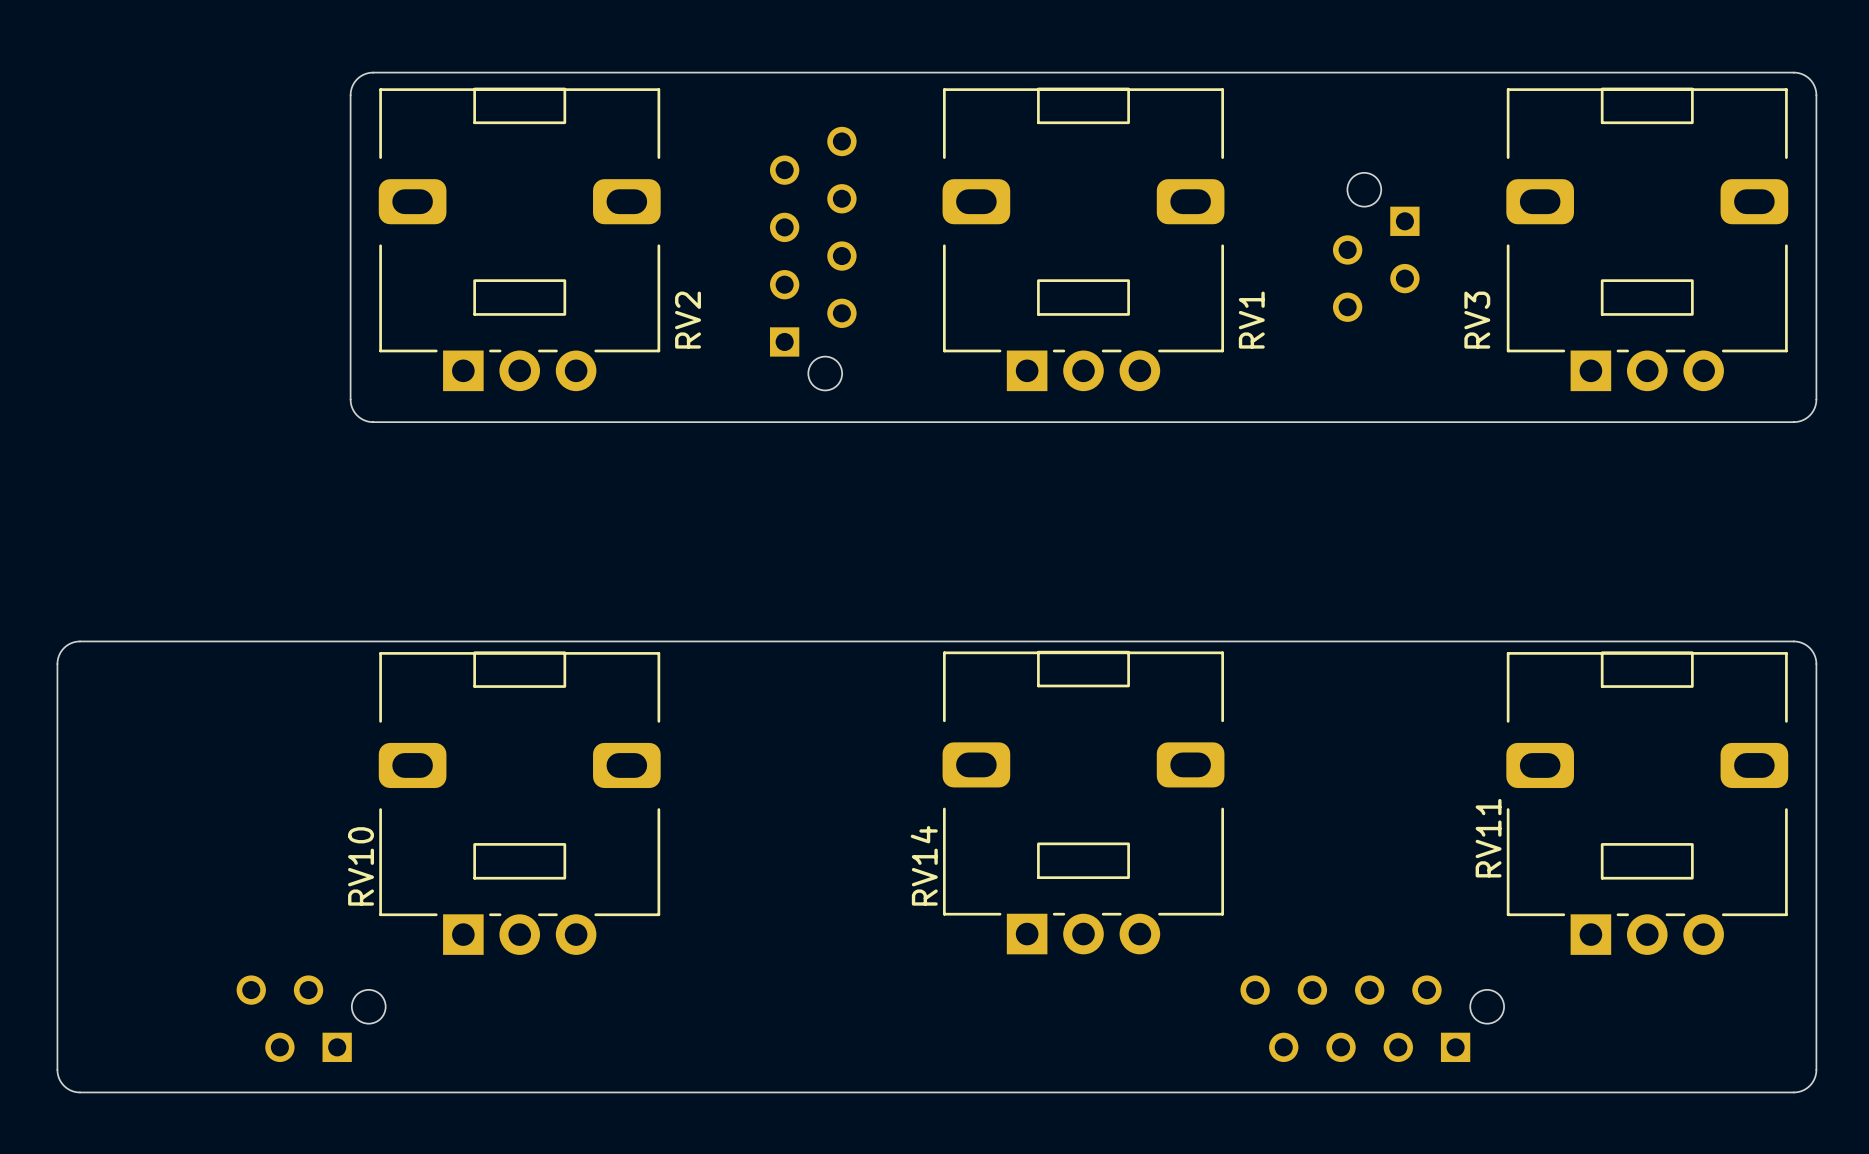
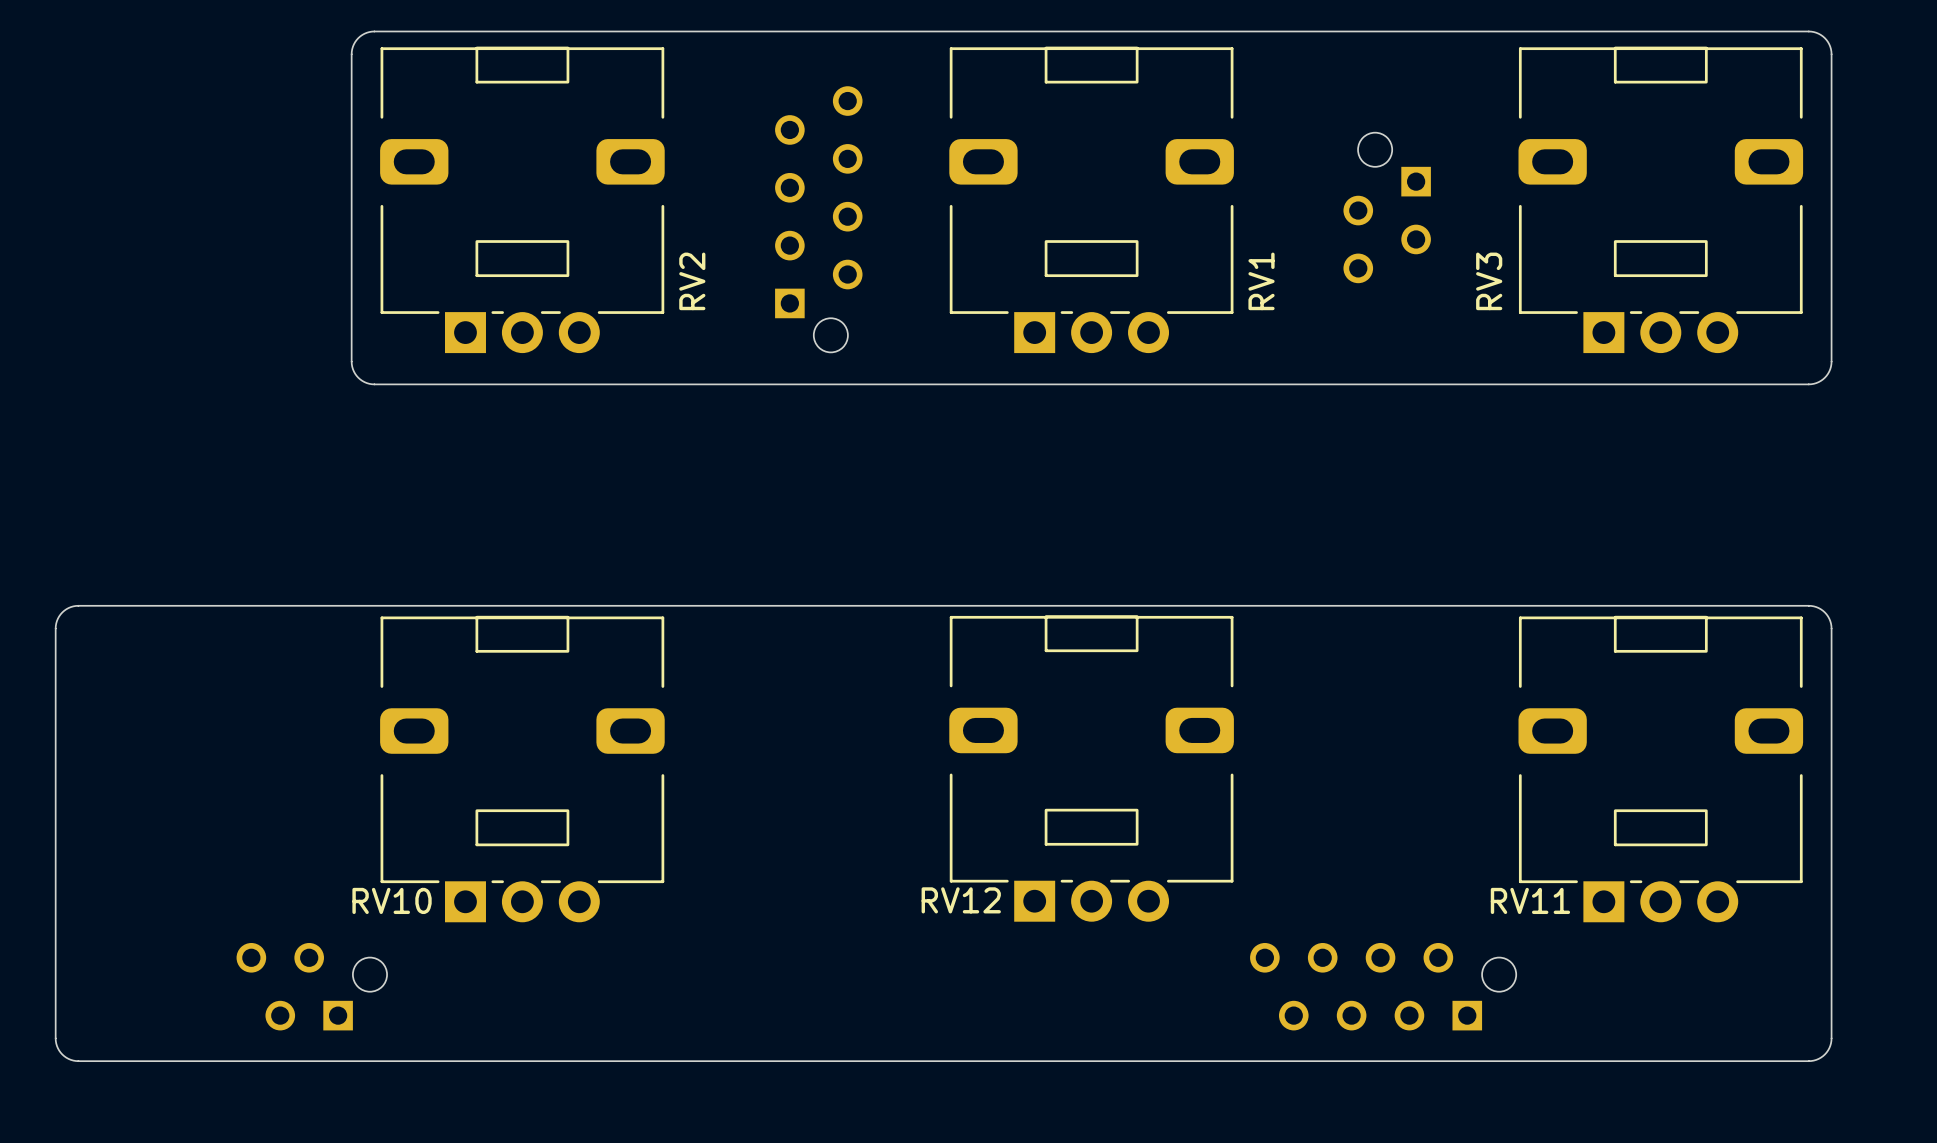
RV11 name rotation: 0° (1488, 838) -> 90° clockwise (1530, 900)
RV14 name: RV14 (924, 865) -> RV12 (961, 900)
RV10 name rotation: 0° (361, 866) -> 90° clockwise (392, 900)

